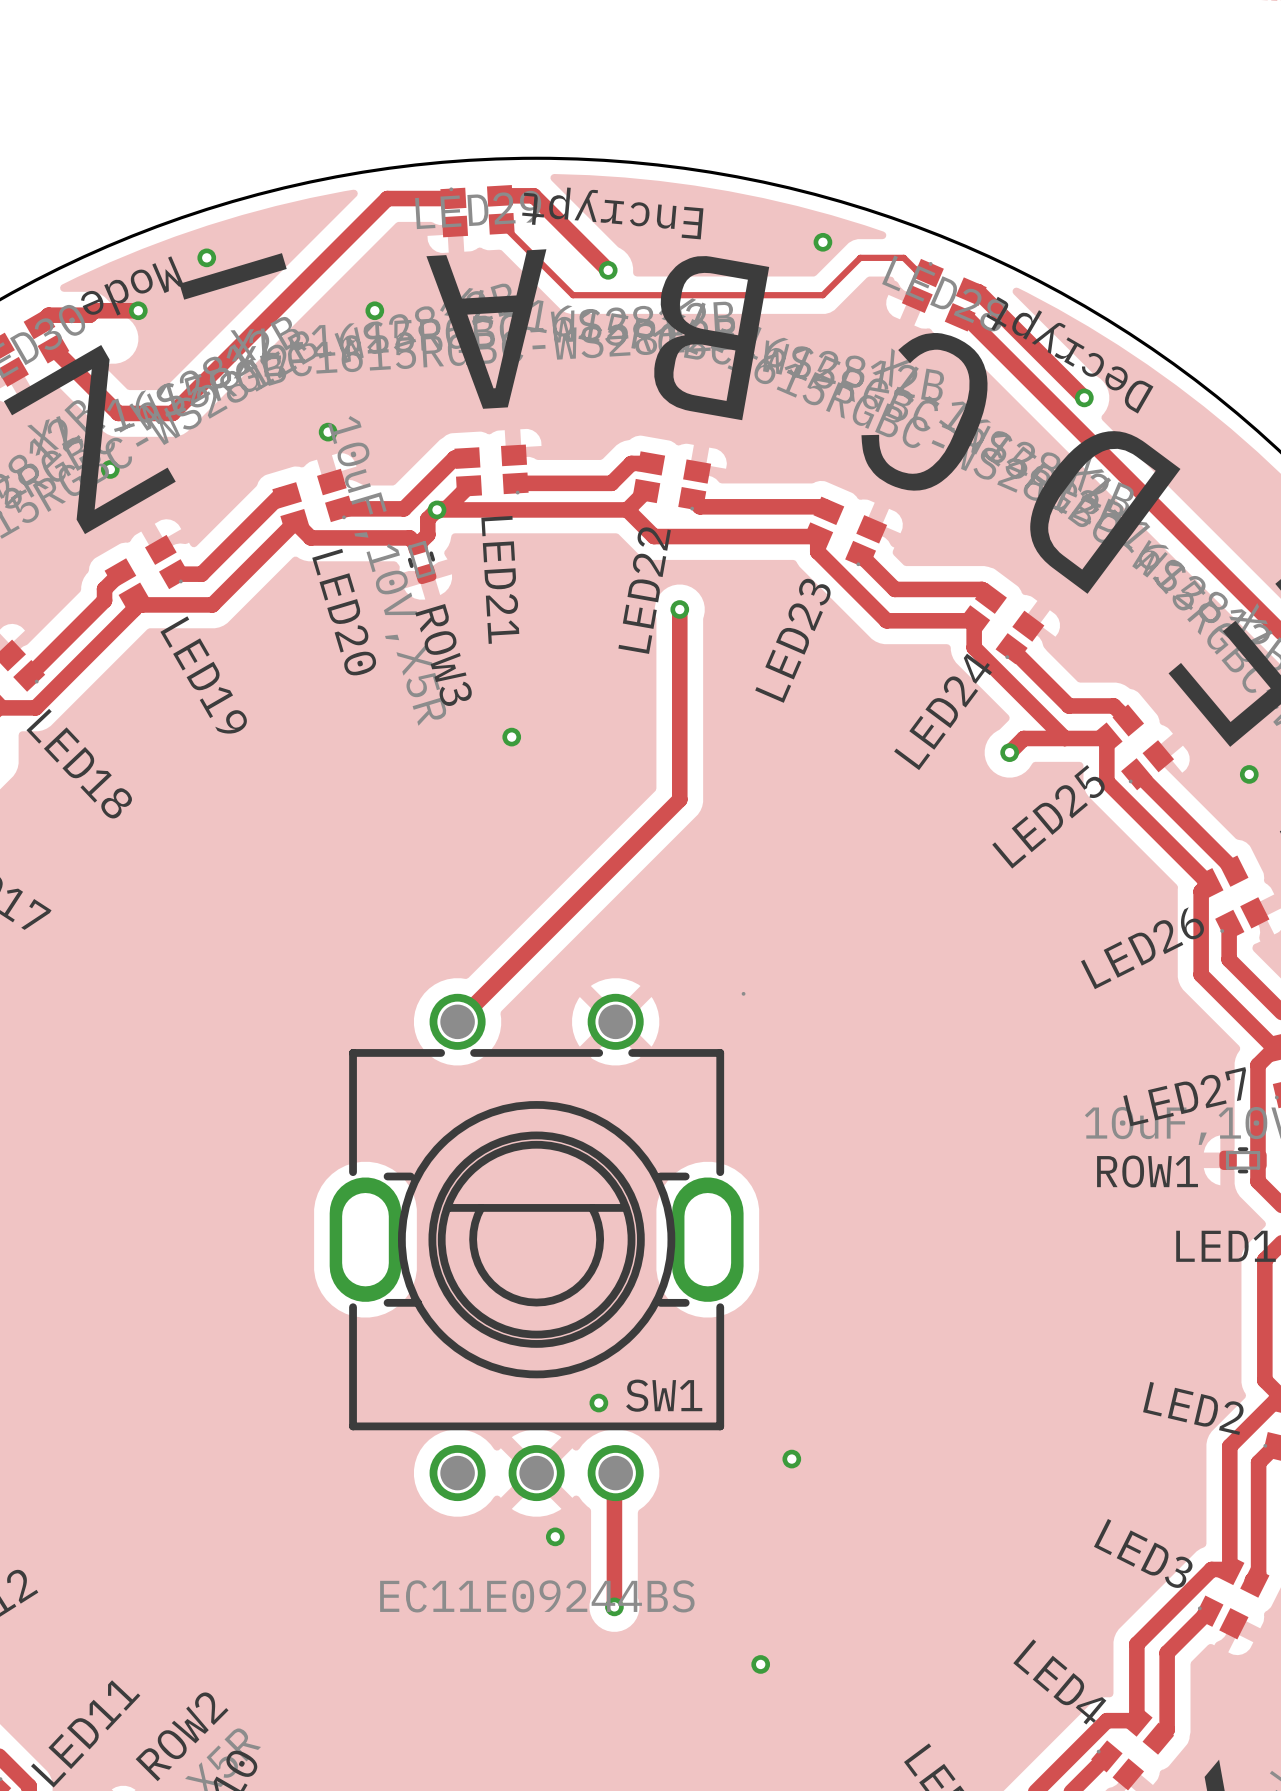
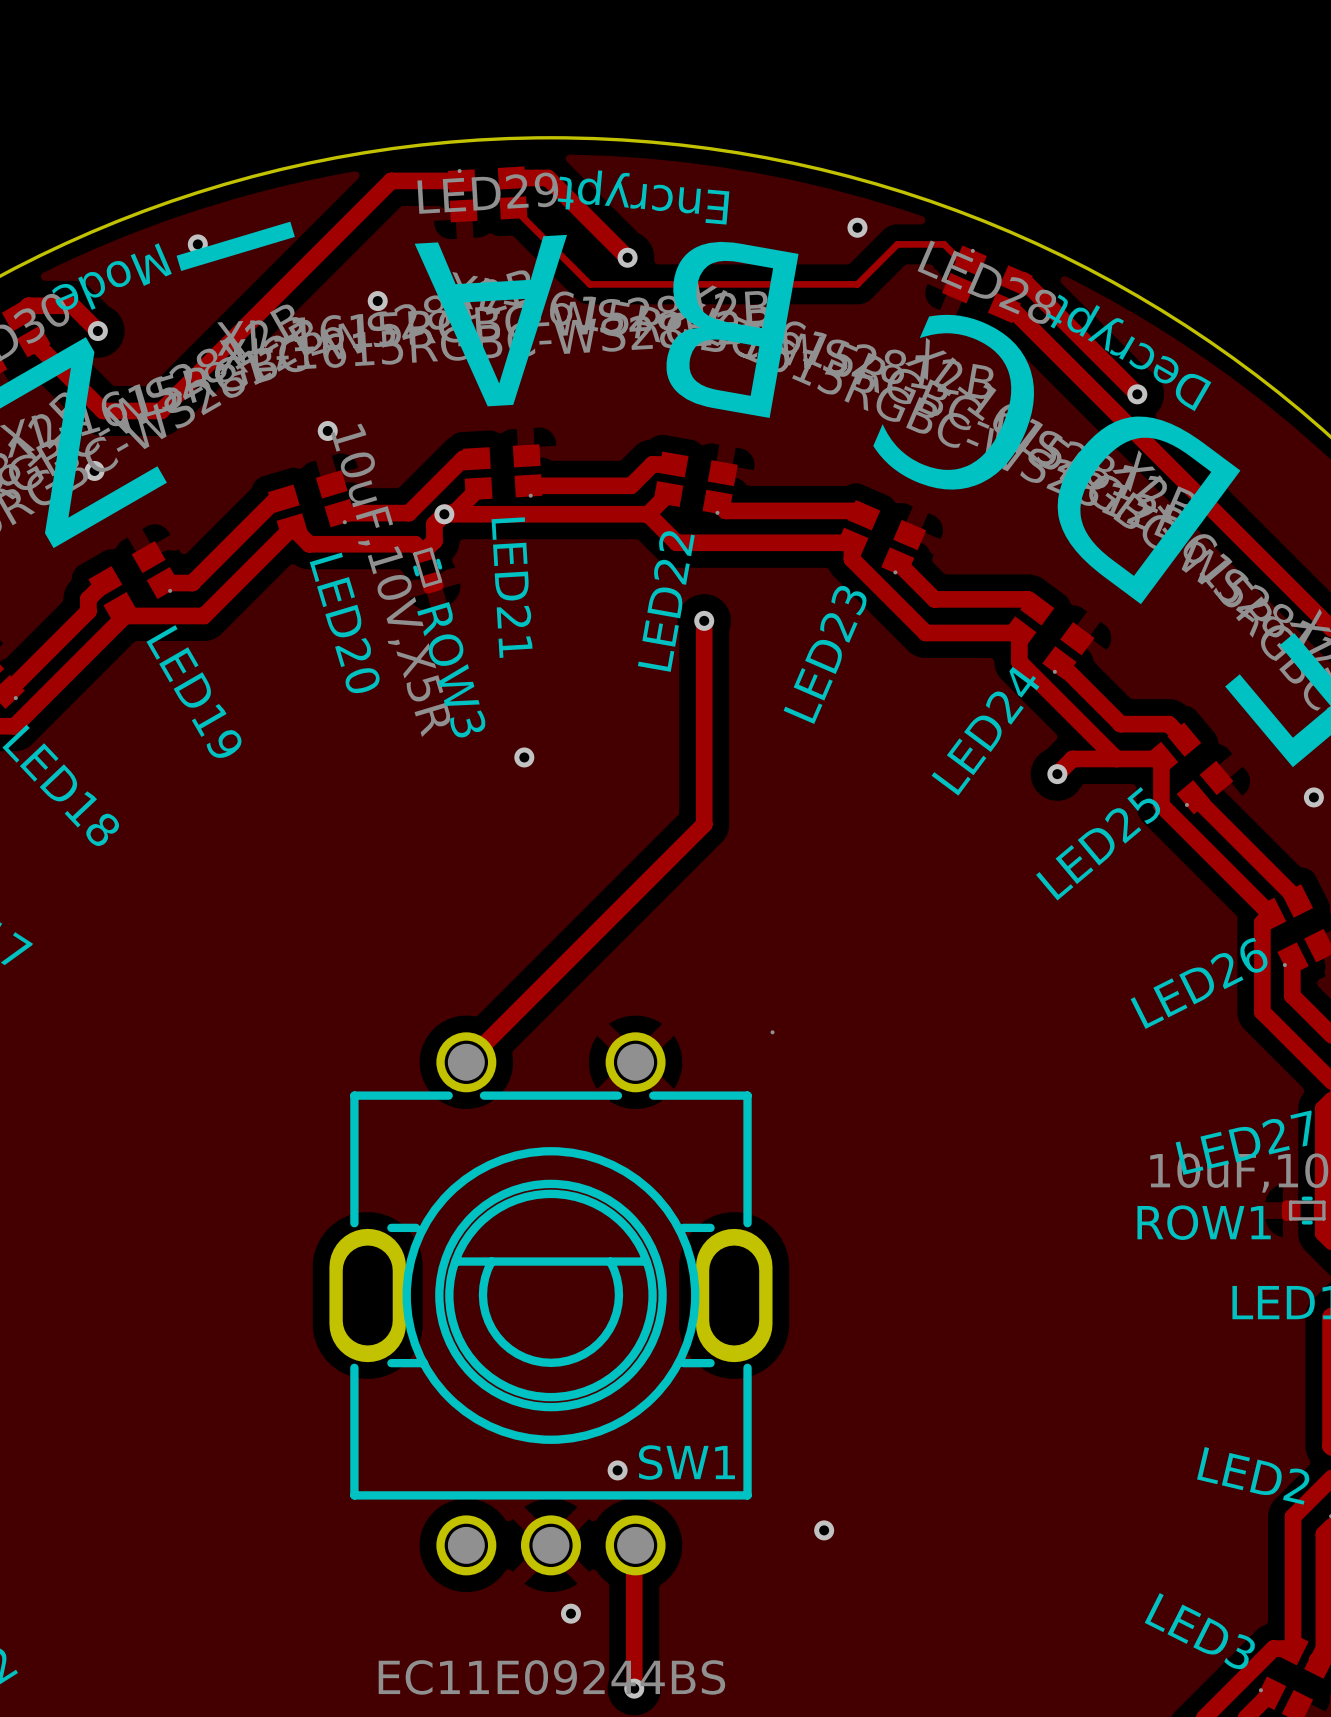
track: (138, 310) (94, 310) (89, 315) -> (97, 331) (72, 305)
via position: (138, 310) -> (97, 331)

